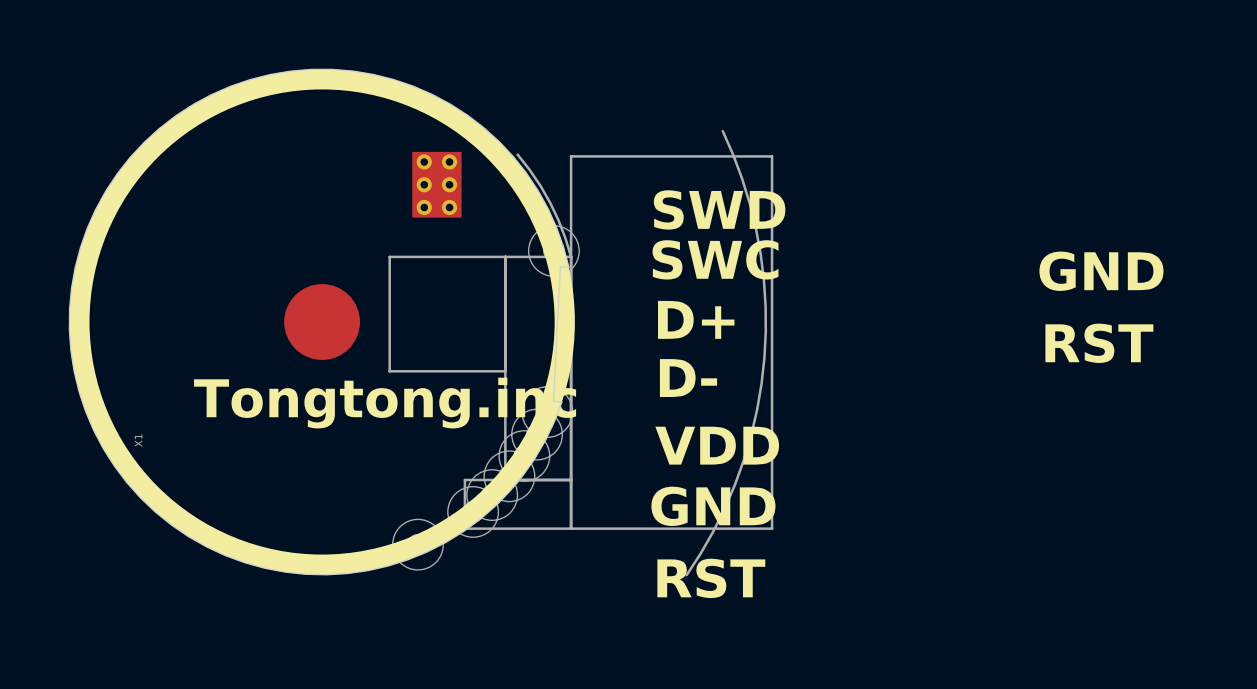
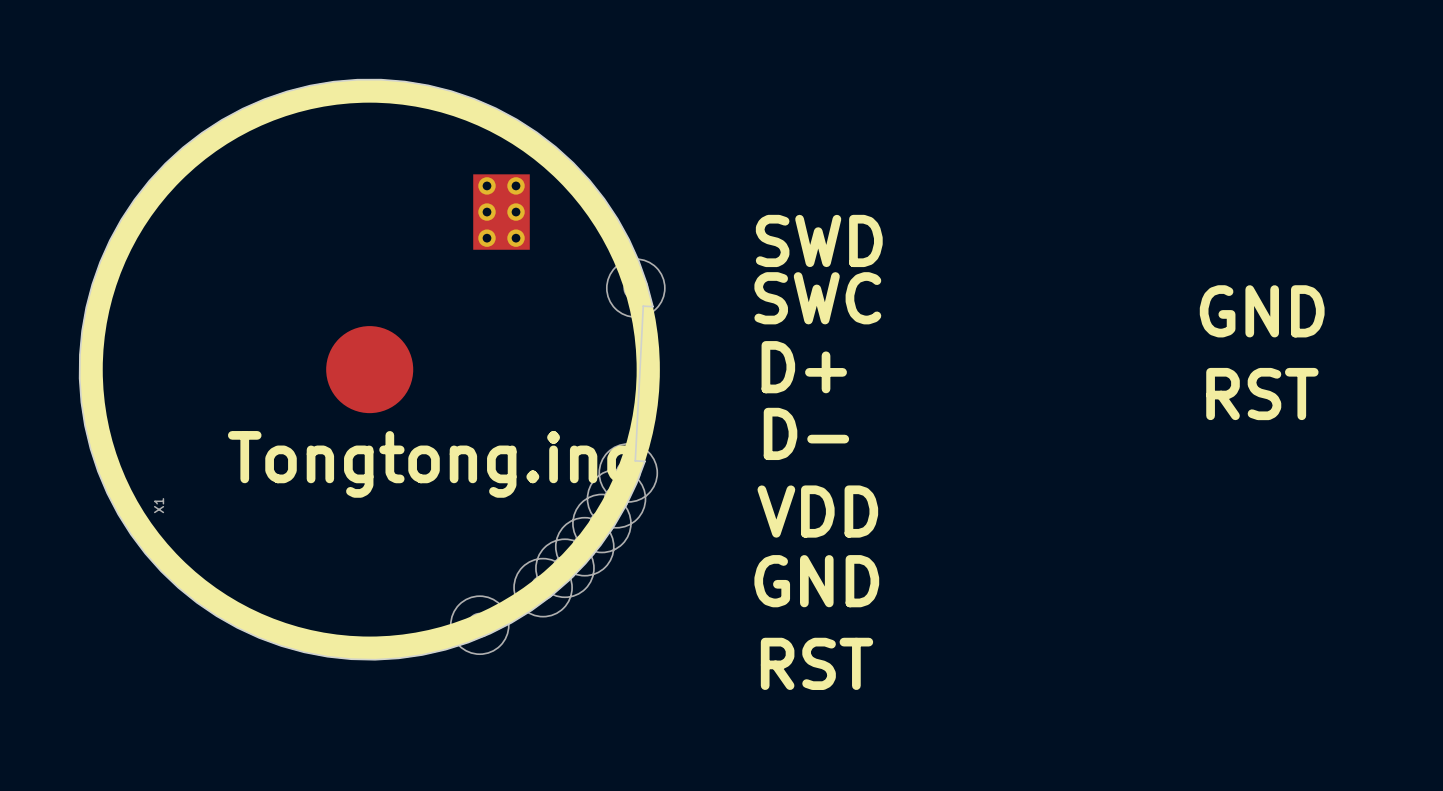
line: (722, 131) (742, 179) (756, 229) (760, 254) (765, 306) (764, 357) (757, 409) (744, 459) (725, 507) (713, 530) (686, 575) -> none
line: (517, 154) (550, 202) (571, 256) (389, 256) (389, 371) (505, 371) -> none
line: (505, 256) (505, 479) -> none
line: (571, 479) (464, 479) (464, 528) (772, 528) (772, 156) (571, 156) (571, 528) -> none

